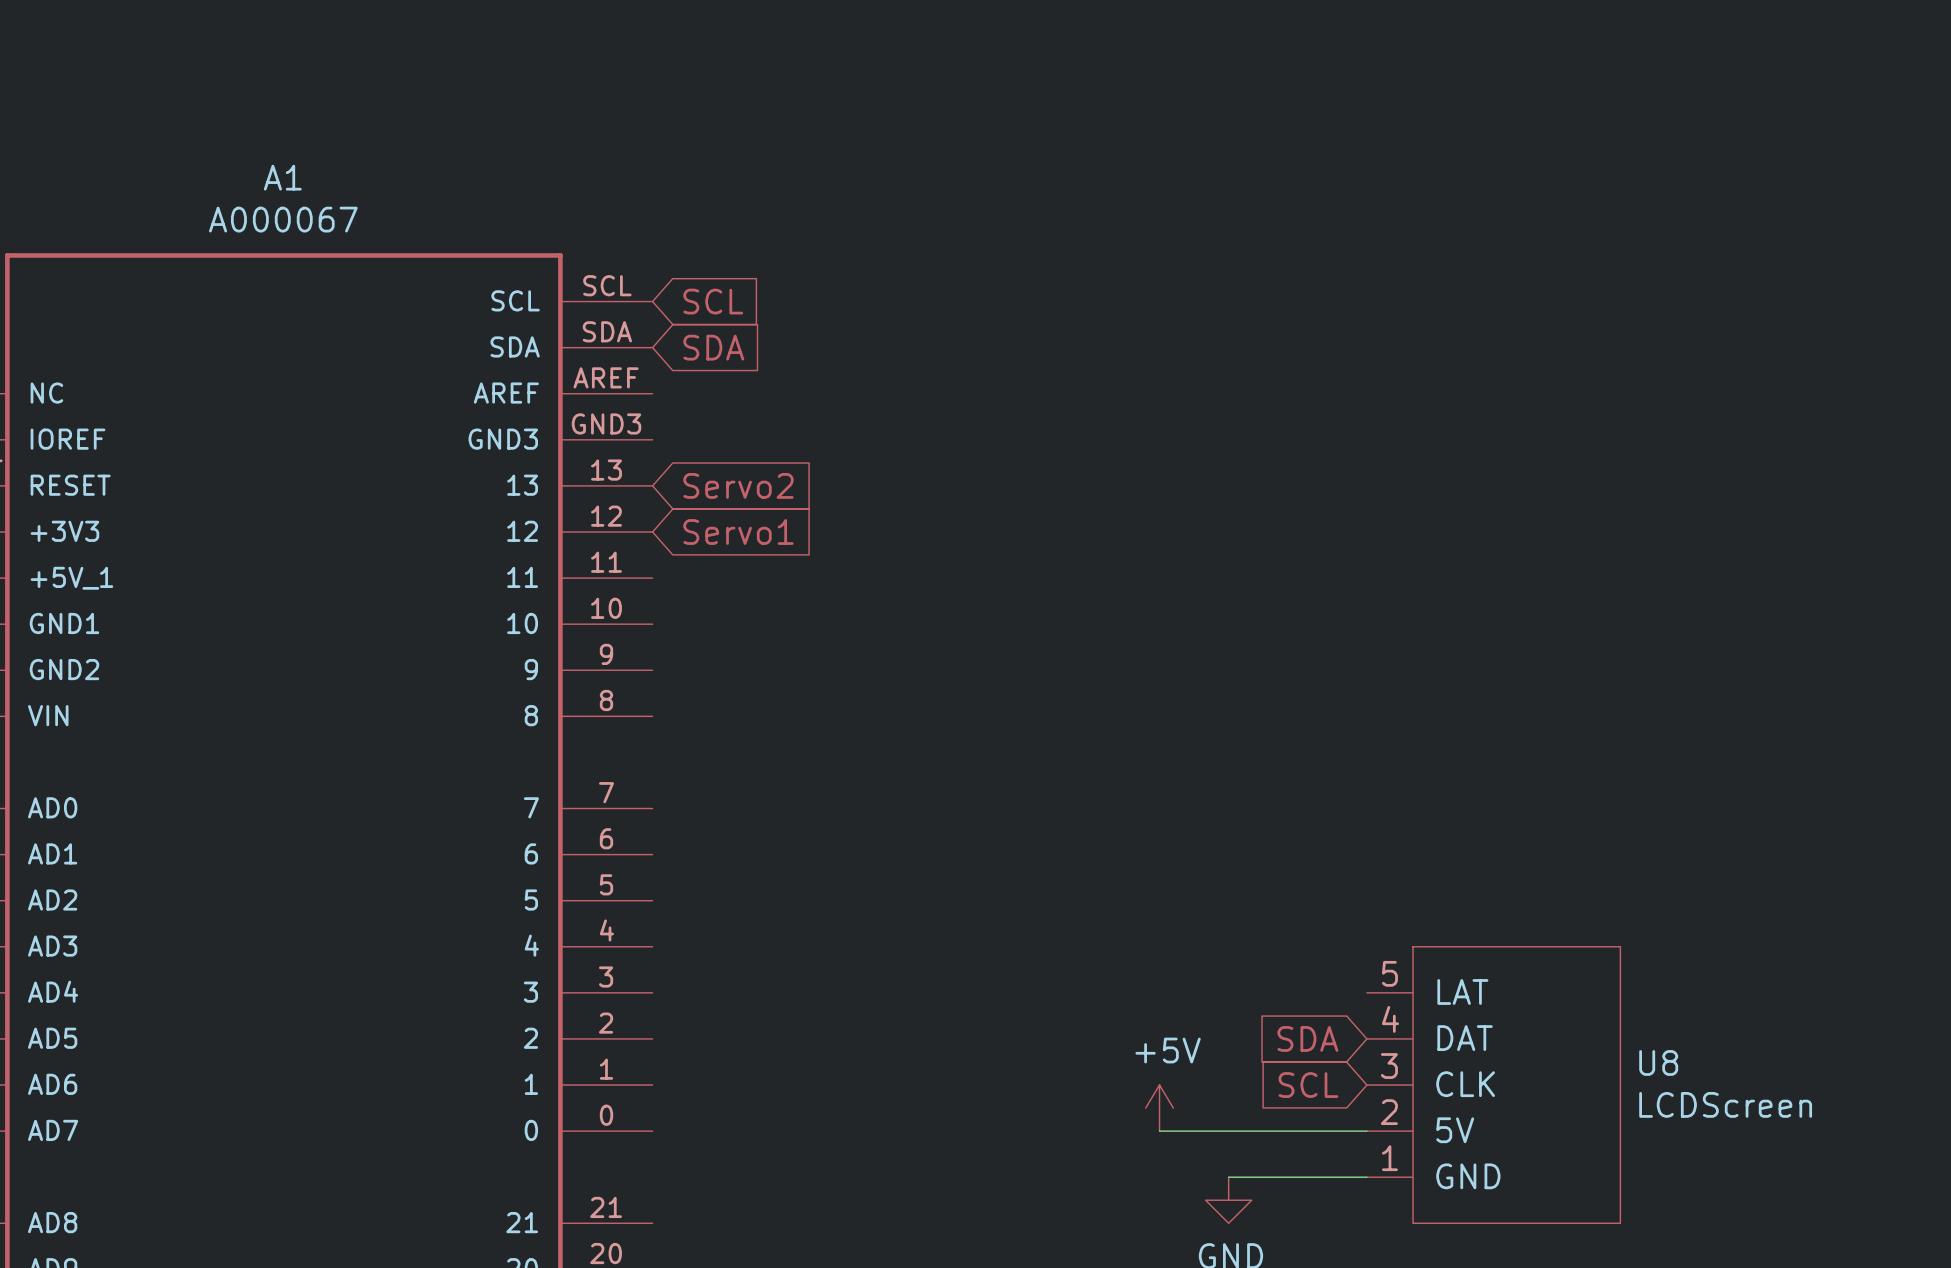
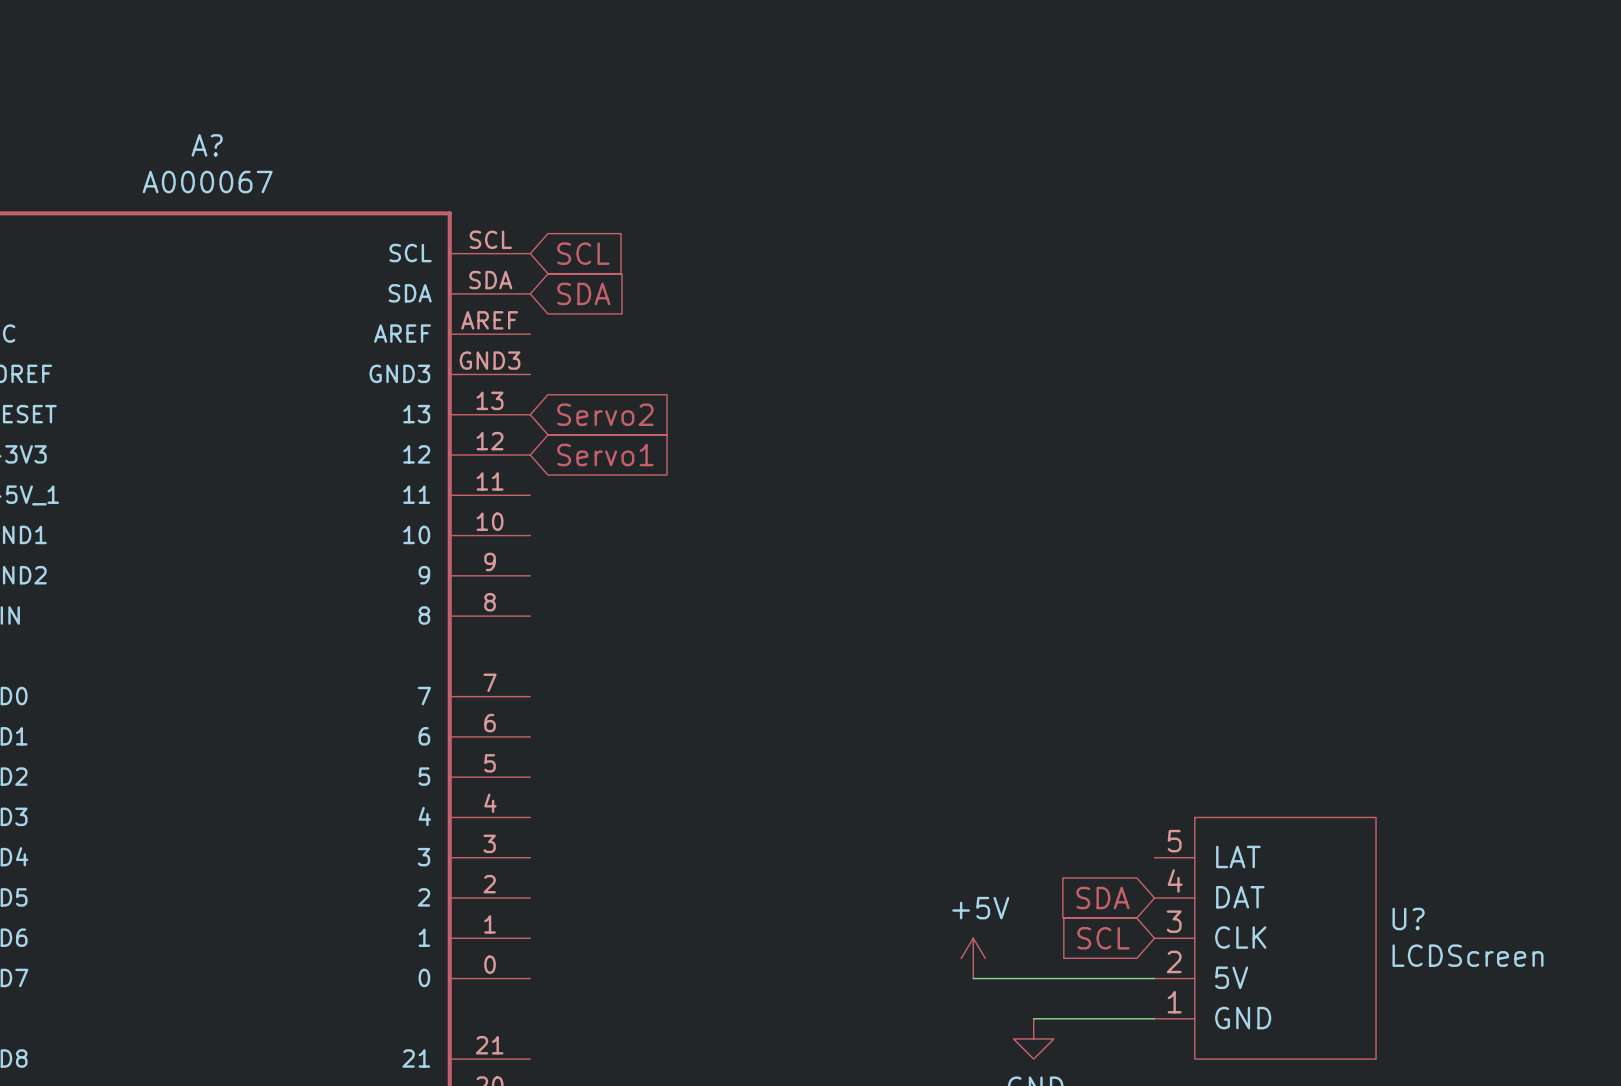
A1 name: A1 (282, 177) -> A? (207, 145)
U8 name: U8 (1658, 1062) -> U? (1408, 919)

